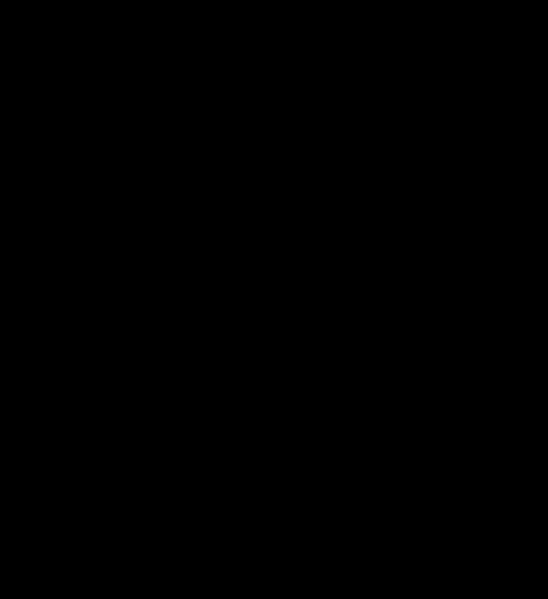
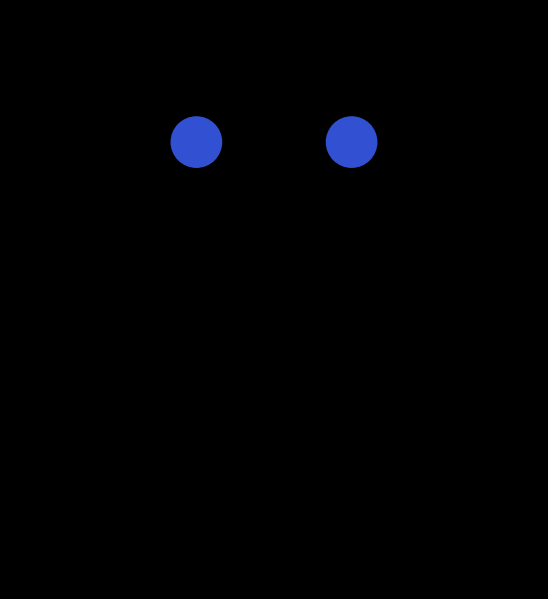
part: none -> (196, 142)
part: none -> (351, 142)

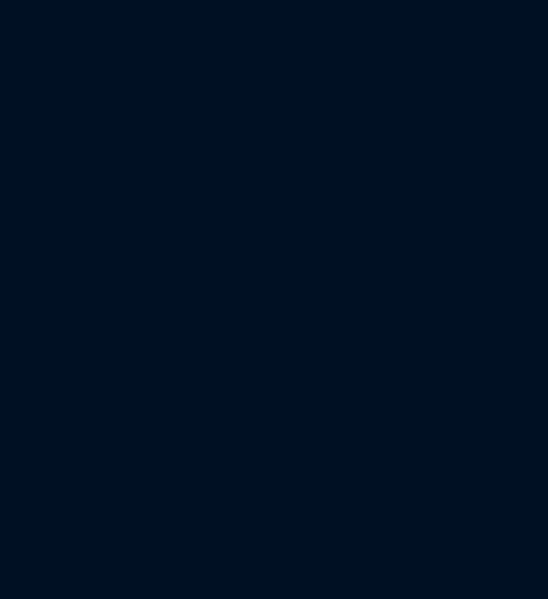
part: (196, 142) -> none
part: (351, 142) -> none

